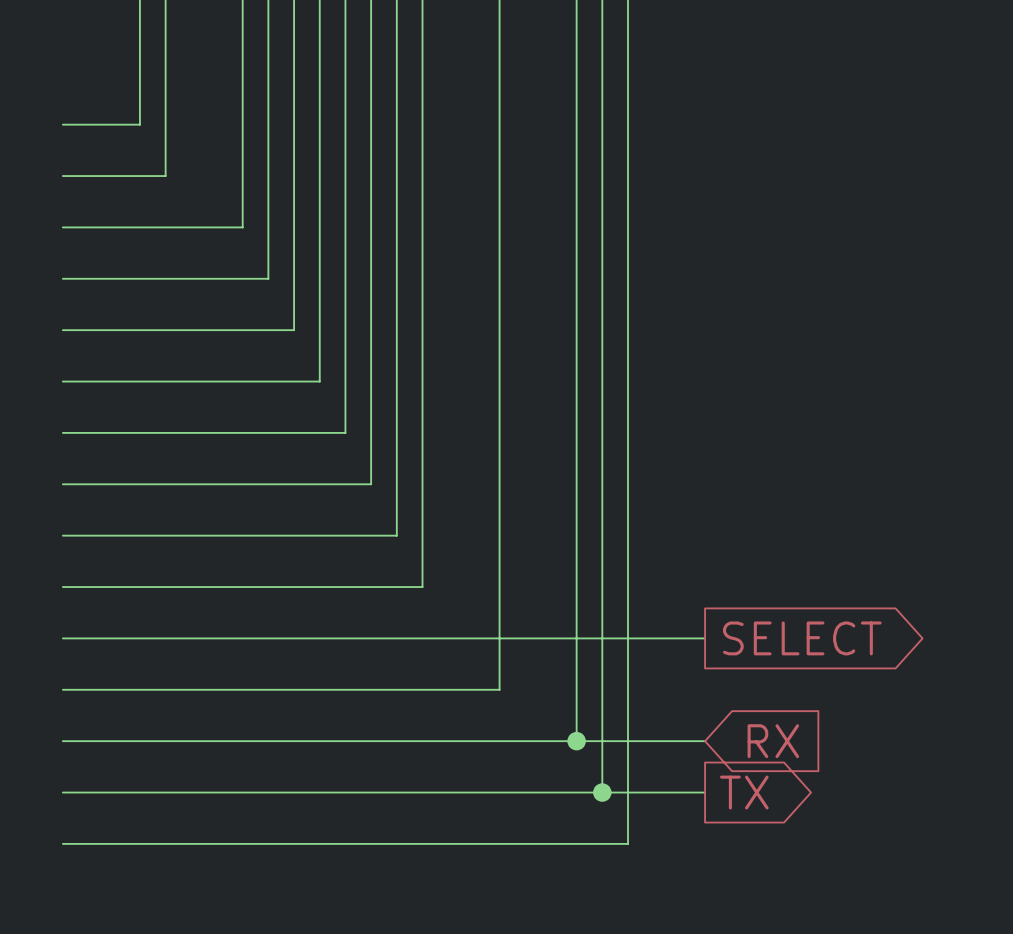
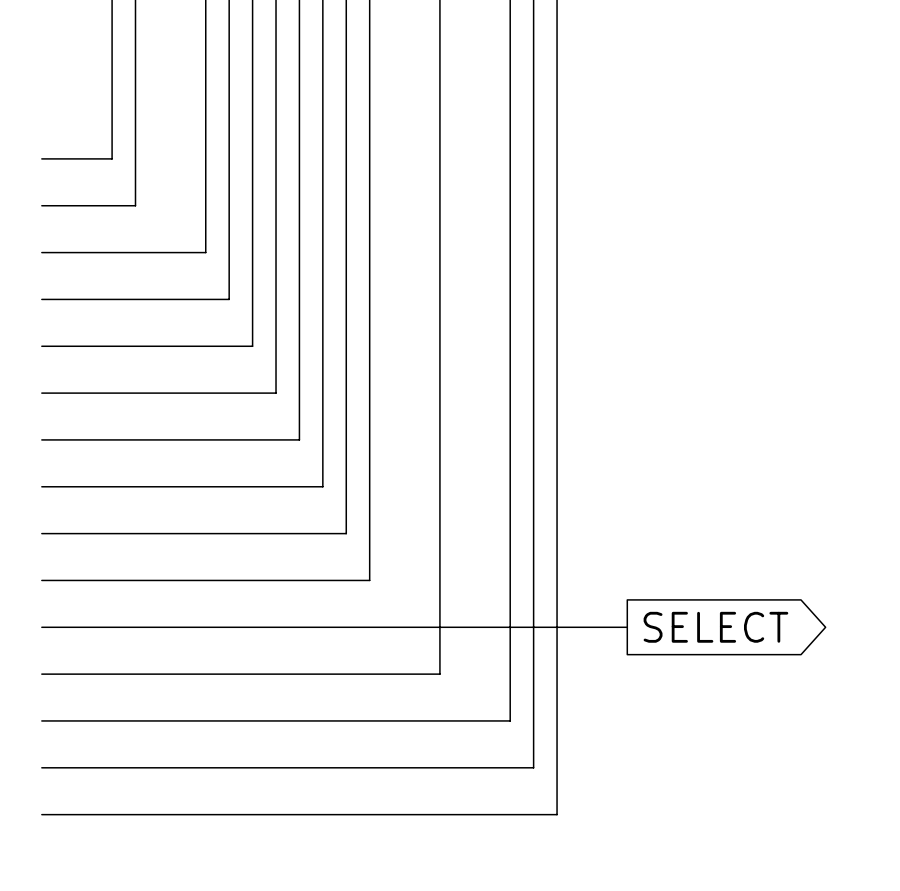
wire: (576, 741) (705, 741) -> none
junction: (576, 741) -> none
global label: RX (773, 741) -> none
wire: (602, 792) (705, 792) -> none
junction: (602, 792) -> none
global label: TX (744, 792) -> none

